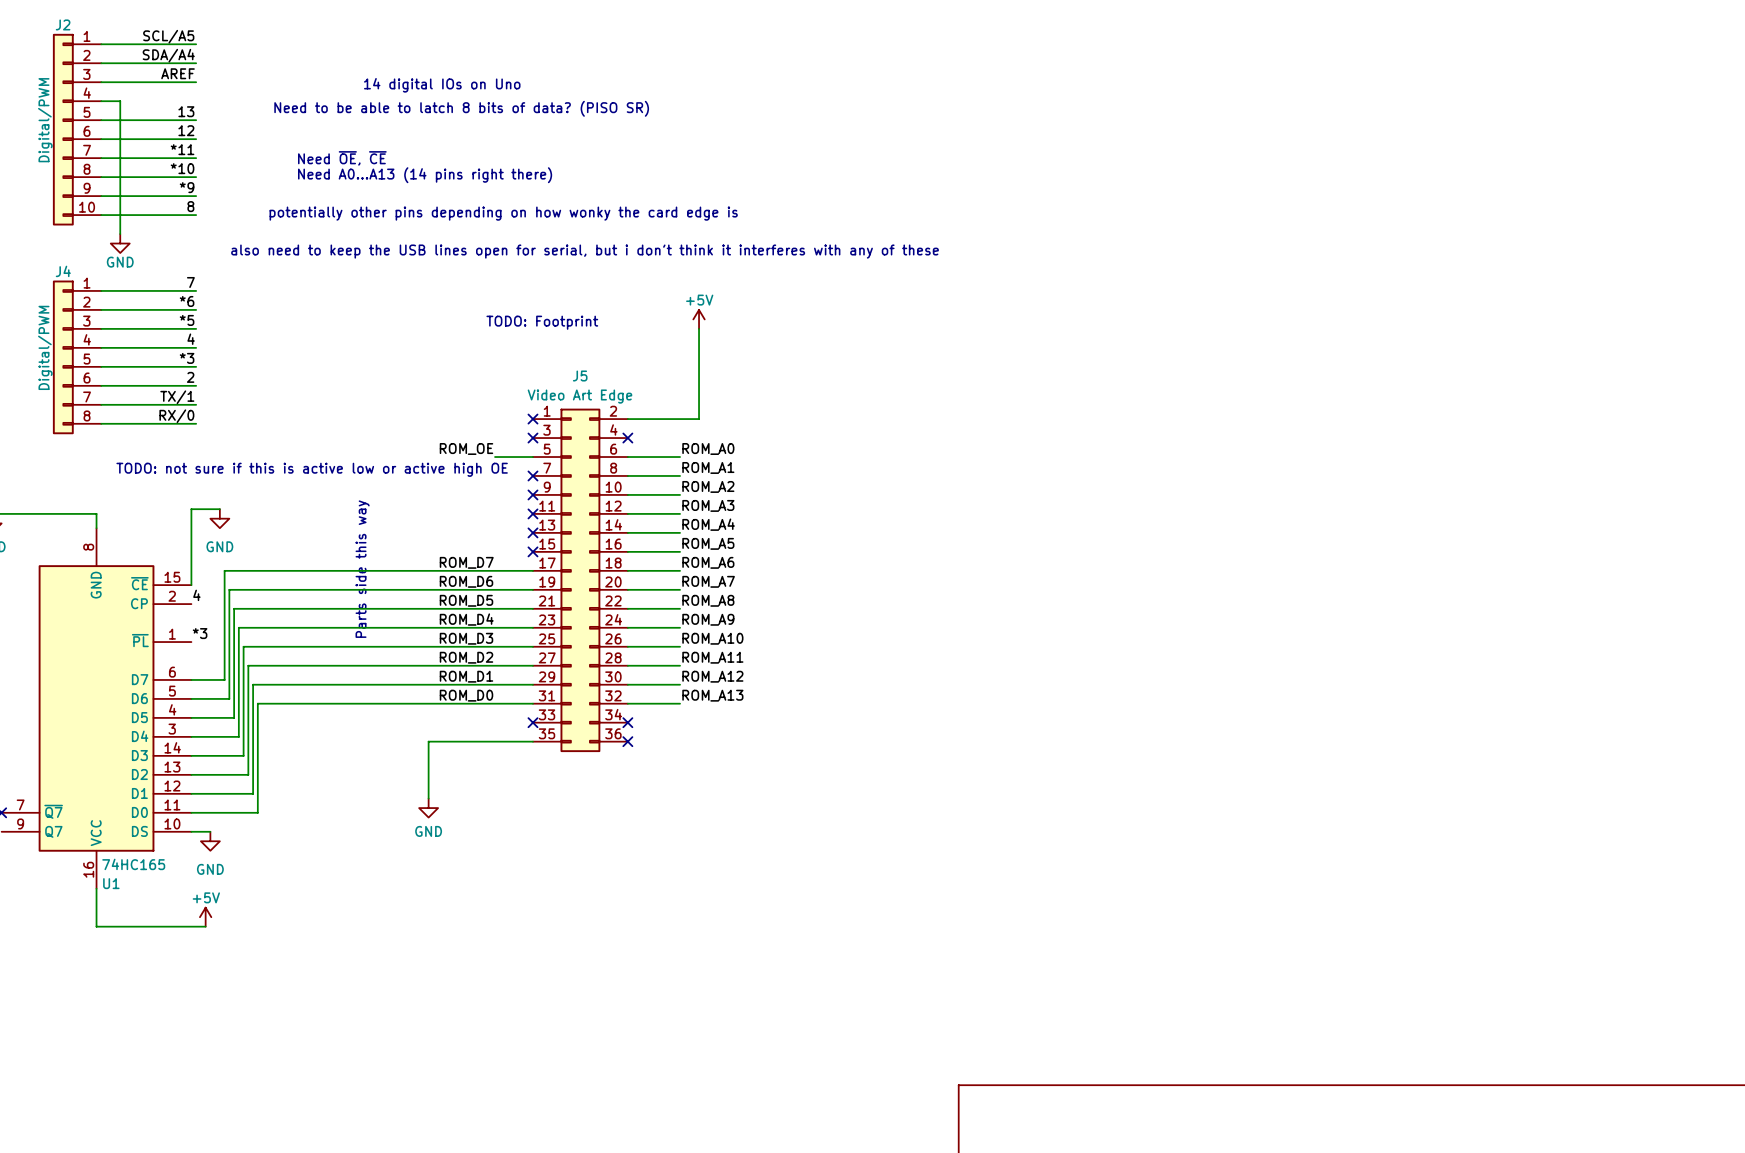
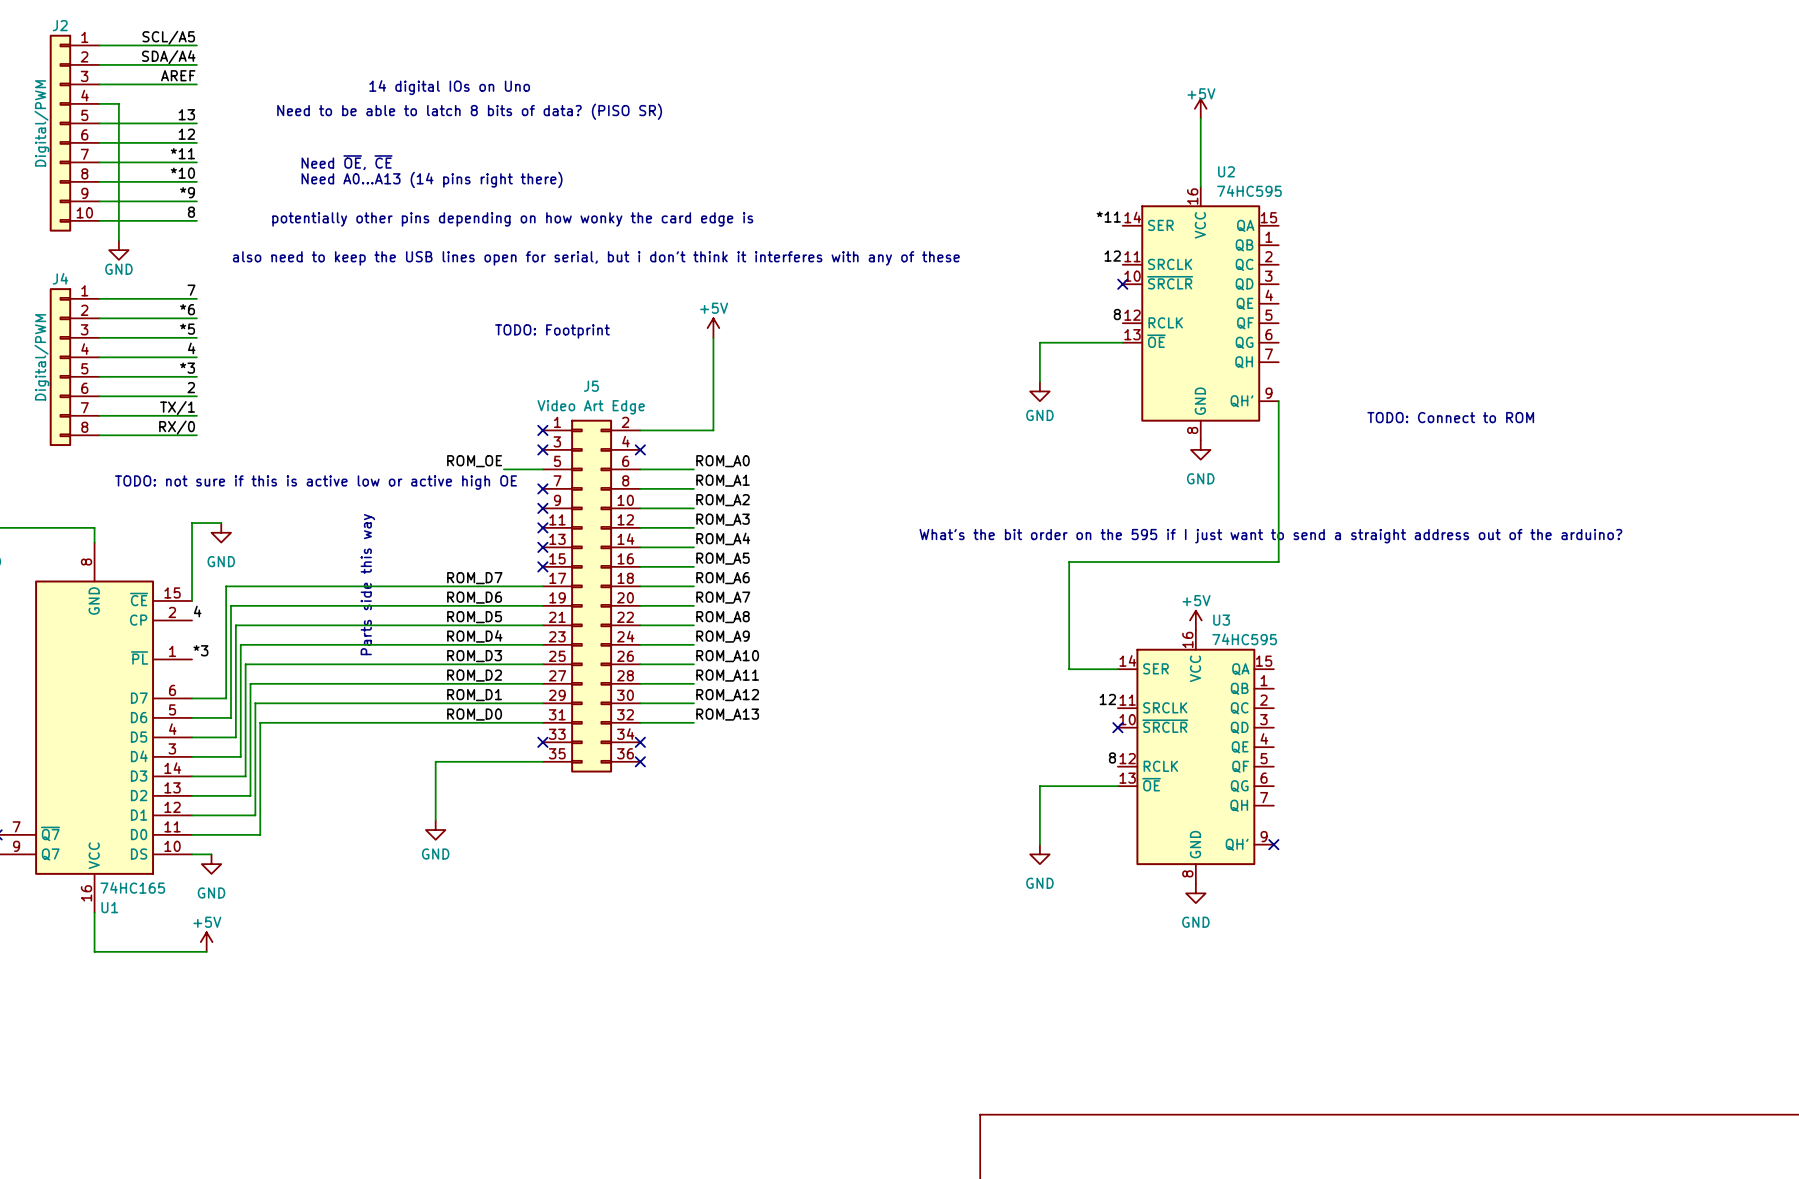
power symbol: none -> +5V (1200, 108)
wire: none -> (1200, 118) (1200, 186)
label: none -> *11 (1108, 217)
label: none -> 12 (1112, 256)
no-connect mark: none -> (1122, 284)
U2: none -> 74HC595 (1200, 313)
label: none -> 8 (1117, 314)
wire: none -> (1122, 342) (1039, 342) (1039, 381)
power symbol: none -> GND (1039, 391)
wire: none -> (1278, 401) (1278, 562) (1069, 562) (1069, 669) (1117, 669)
text: none -> TODO: Connect to ROM (1450, 417)
power symbol: none -> GND (1200, 449)
text: none -> What's the bit order on the 595 if I just want to send a straight address out of the arduino? (1270, 536)
power symbol: none -> +5V (1195, 620)
label: none -> 12 (1107, 699)
no-connect mark: none -> (1117, 727)
U3: none -> 74HC595 (1195, 756)
label: none -> 8 (1112, 757)
wire: none -> (1117, 786) (1039, 786) (1039, 844)
no-connect mark: none -> (1273, 844)
power symbol: none -> GND (1039, 854)
power symbol: none -> GND (1195, 893)

